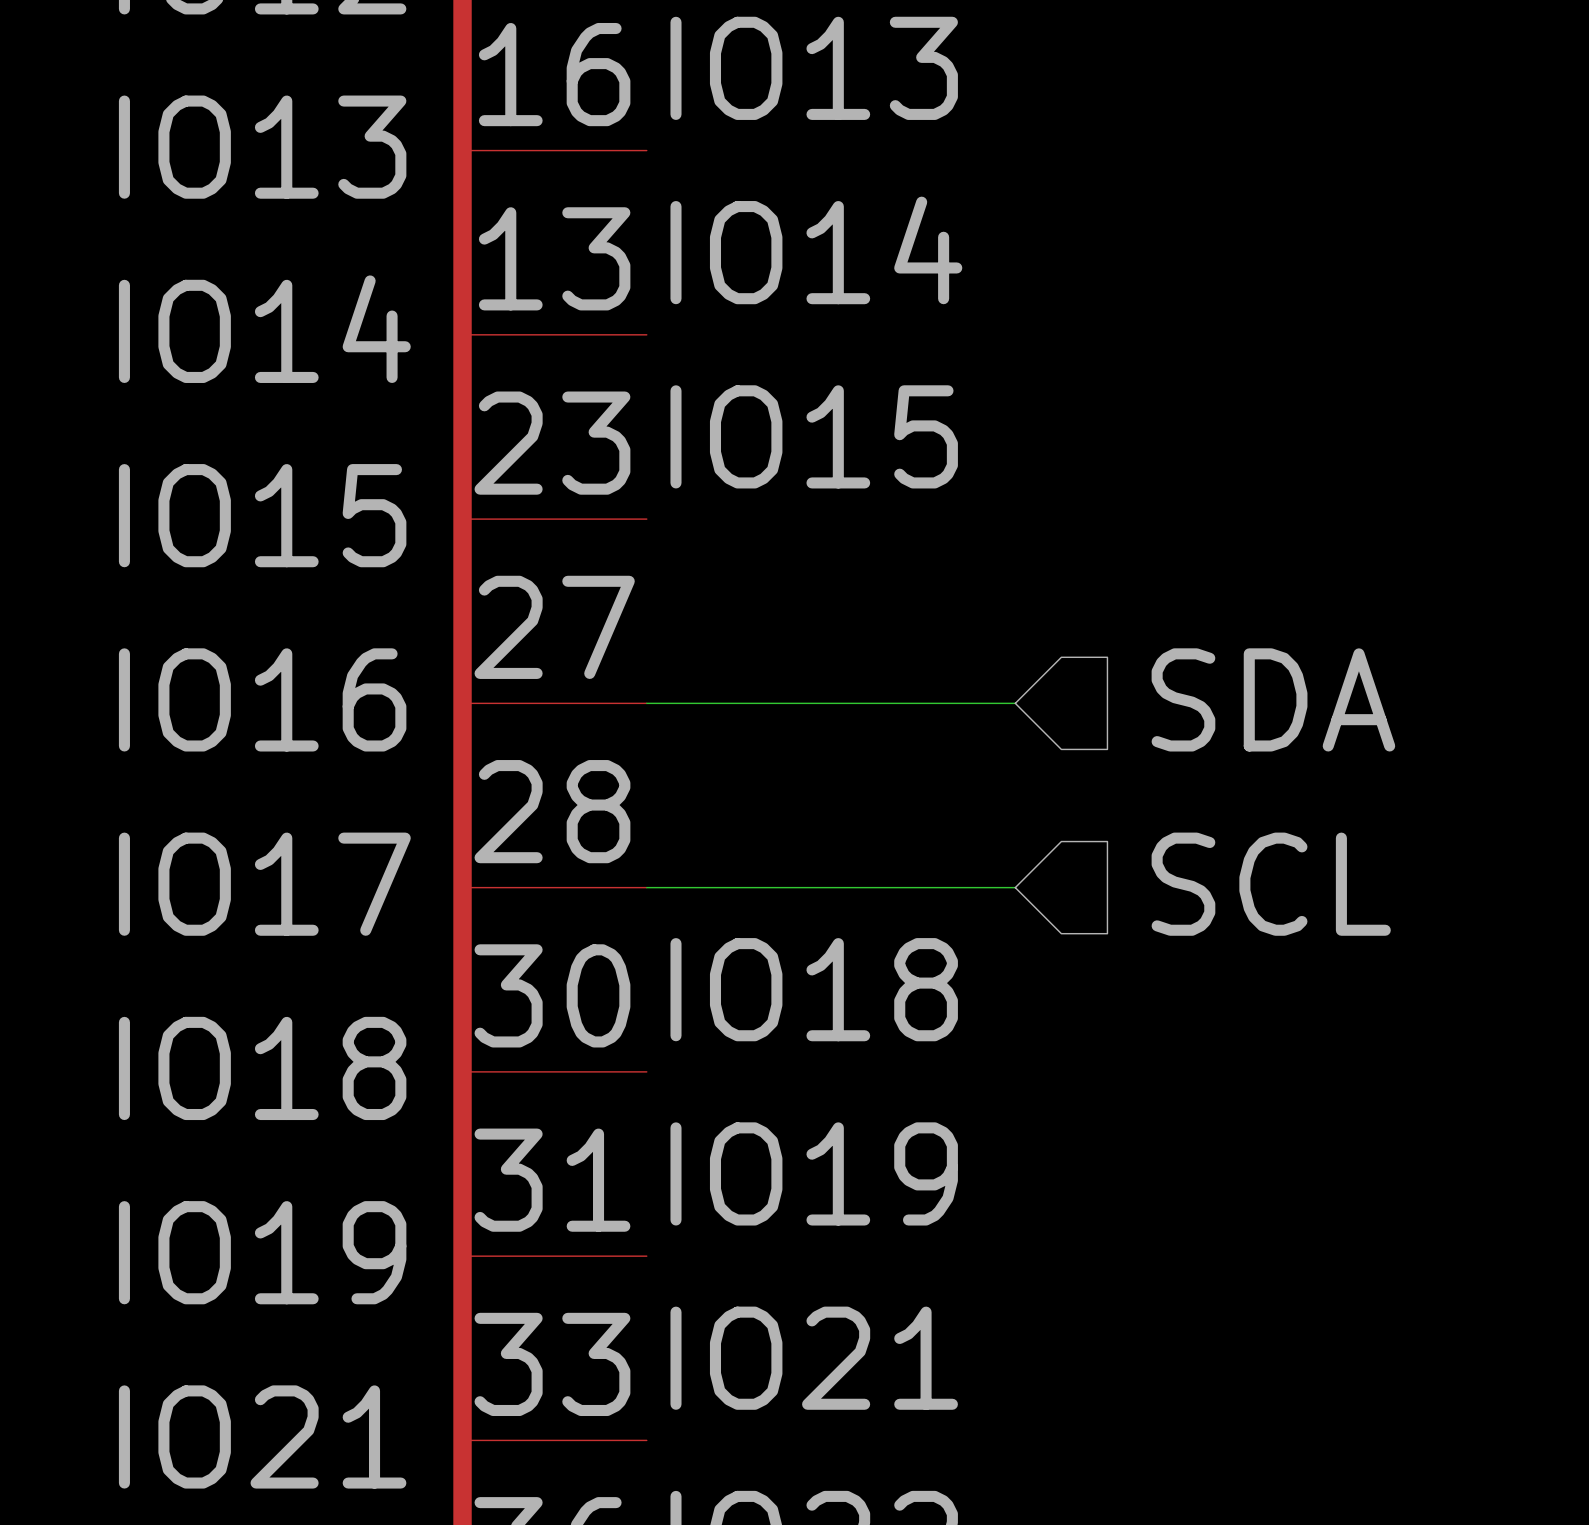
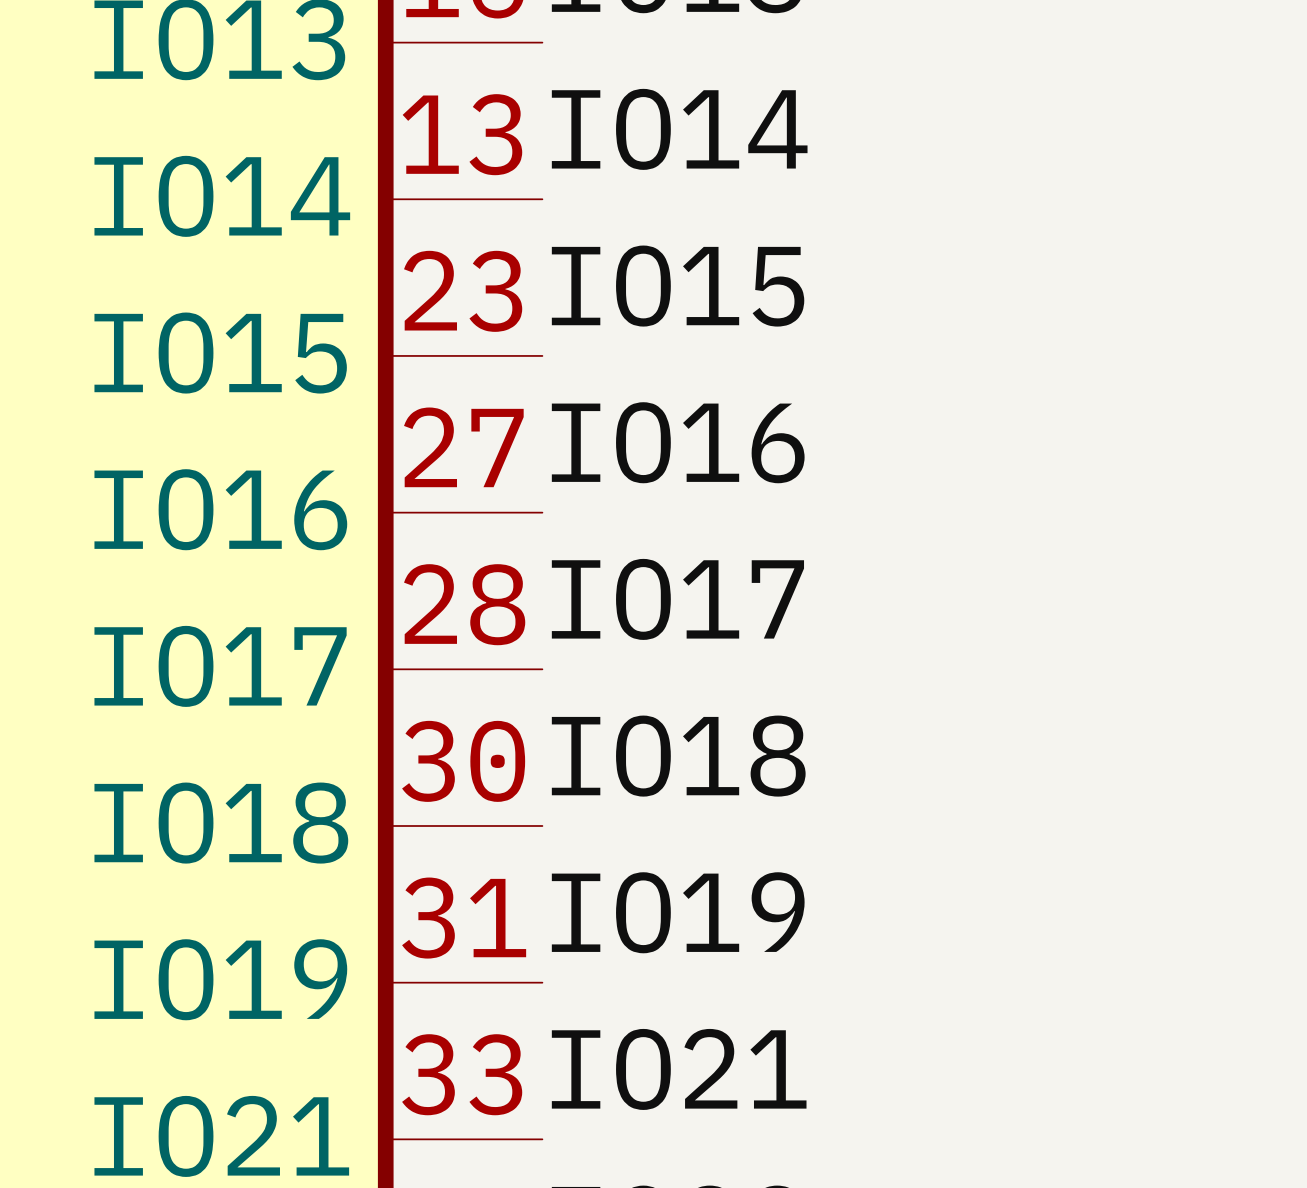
label: none -> IO16 (678, 442)
hierarchical label: SDA (1273, 699) -> none
wire: (646, 703) (1015, 703) -> none
label: none -> IO17 (677, 599)
hierarchical label: SCL (1271, 884) -> none
wire: (646, 887) (1015, 887) -> none

